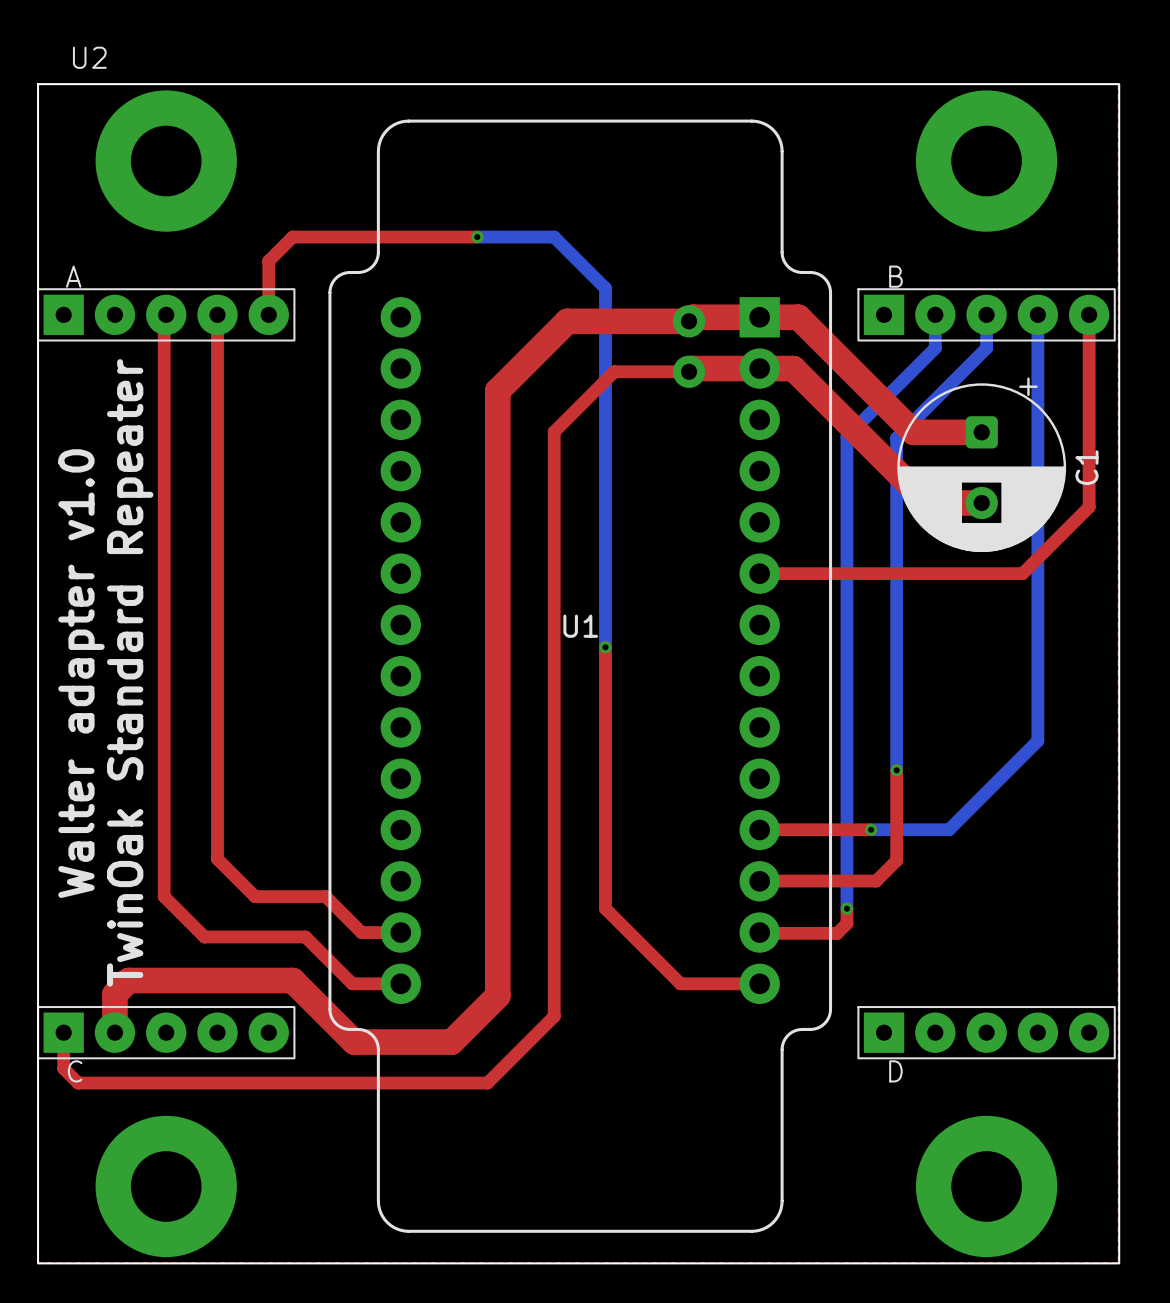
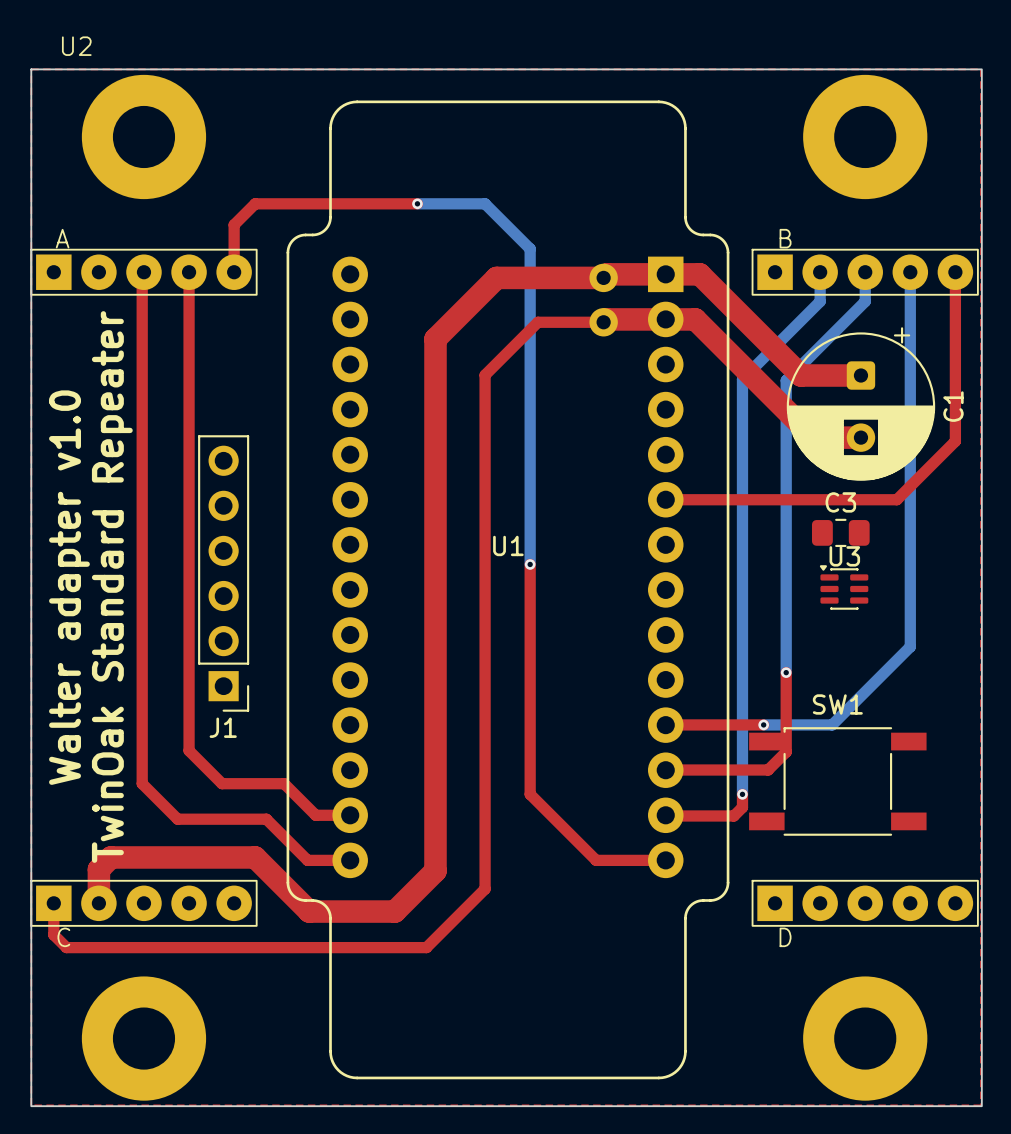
C3: none -> (840, 532)
J1: none -> (223, 573)
U3: none -> (844, 587)
SW1: none -> (837, 781)

